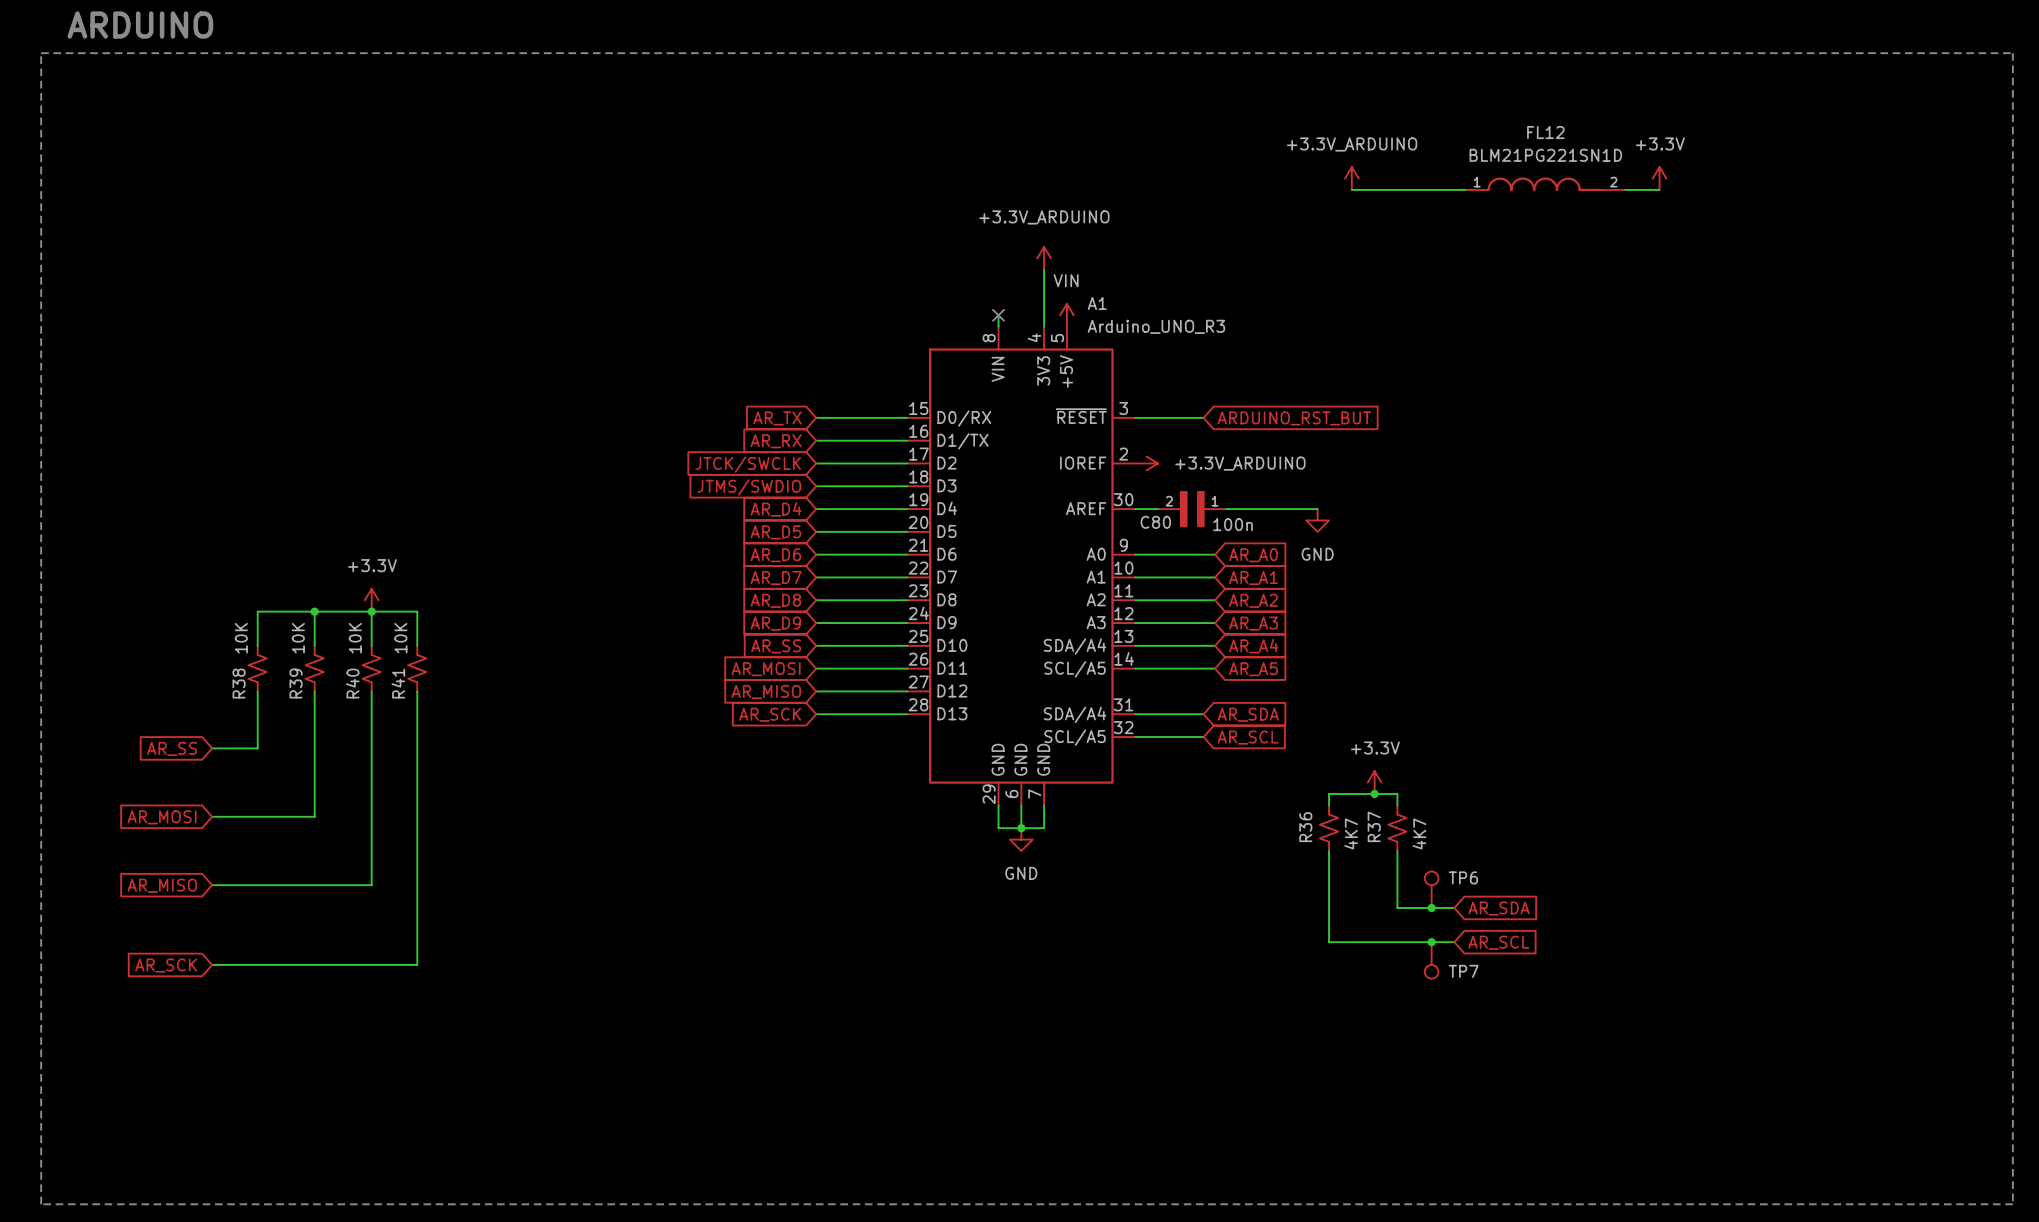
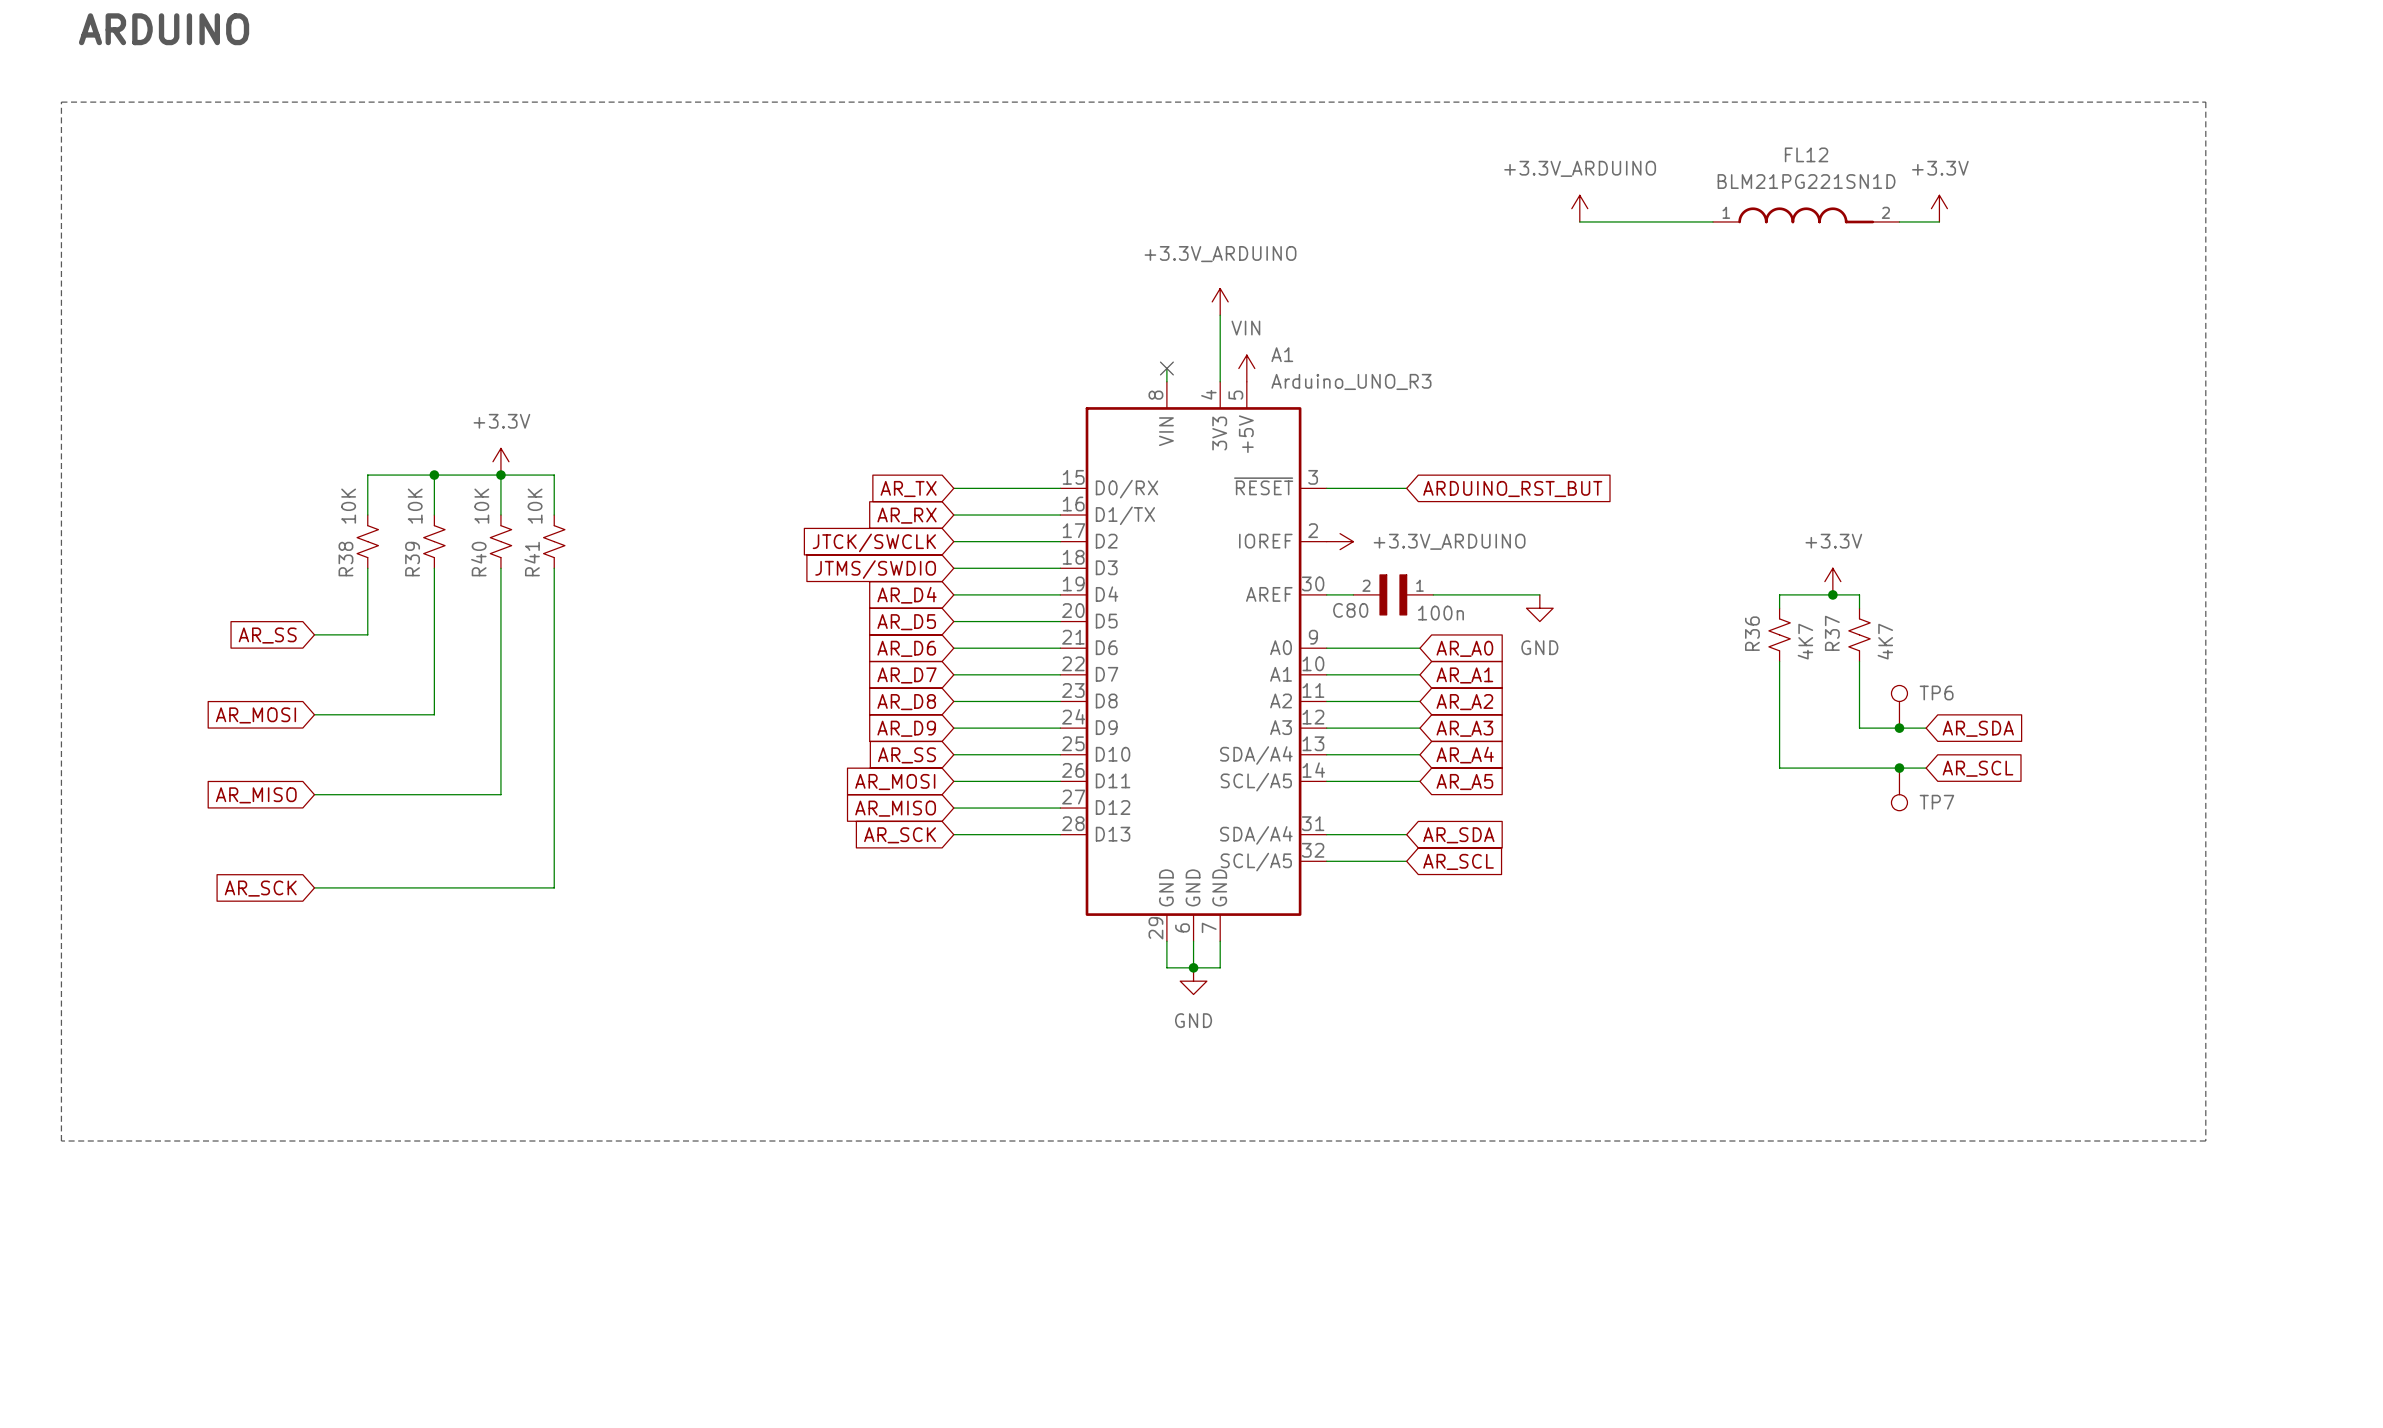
line: (41, 53) (2012, 53) (2012, 1204) (41, 1204) (41, 53) -> (61, 102) (61, 1141) (2205, 1141) (2205, 102) (61, 102)
junction: none -> (434, 475)
wire: none -> (500, 475) (500, 515)
junction: none -> (500, 475)
wire: none -> (367, 515) (367, 475) (554, 475) (554, 515)
wire: none -> (434, 568) (434, 714)
power symbol: none -> +3.3V (1832, 581)
junction: none -> (1832, 594)
wire: none -> (1779, 608) (1779, 594) (1859, 594) (1859, 608)
wire: none -> (1779, 661) (1779, 768) (1926, 768)
wire: none -> (1859, 661) (1859, 728) (1926, 728)
power symbol position: +3.3V (371, 600) -> +3.3V (500, 461)
wire: (269, 611) (257, 611) (257, 645) -> none
wire: (314, 611) (314, 645) -> (434, 475) (434, 515)
junction: (314, 611) -> none
junction: (371, 611) -> none
junction: none -> (1899, 728)
global label: none -> AR_SDA (1978, 728)
wire: (371, 645) (371, 611) (417, 611) (417, 645) -> none
junction: none -> (1899, 768)
global label: none -> AR_SCL (1977, 768)
R38 position: (257, 668) -> (367, 541)
R39 position: (314, 668) -> (434, 541)
R40 position: (371, 668) -> (500, 541)
R41 position: (417, 668) -> (554, 541)
wire: (257, 691) (257, 748) (212, 748) -> (367, 568) (367, 634) (314, 634)
wire: (314, 691) (314, 816) (212, 816) -> none
wire: (371, 691) (371, 885) (212, 885) -> (500, 568) (500, 794) (314, 794)
wire: (417, 691) (417, 964) (212, 964) -> (554, 568) (554, 887) (314, 887)
global label position: AR_SS (172, 748) -> AR_SS (267, 635)
power symbol: +3.3V (1374, 782) -> none
junction: (1374, 794) -> none
wire: (1329, 805) (1329, 794) (1397, 794) (1397, 805) -> none
global label position: AR_MOSI (162, 817) -> AR_MOSI (255, 715)
R36 position: (1329, 828) -> (1779, 634)
R37 position: (1397, 828) -> (1859, 634)
wire: (1329, 850) (1329, 942) (1454, 942) -> none
wire: (1397, 850) (1397, 907) (1454, 907) -> none
global label position: AR_MISO (162, 885) -> AR_MISO (256, 795)
TP6 position: (1431, 889) -> (1899, 706)
junction: (1431, 907) -> none
global label: AR_SDA (1499, 908) -> none
junction: (1431, 942) -> none
global label: AR_SCL (1498, 942) -> none
TP7 position: (1431, 960) -> (1899, 789)
global label position: AR_SCK (166, 965) -> AR_SCK (260, 888)

